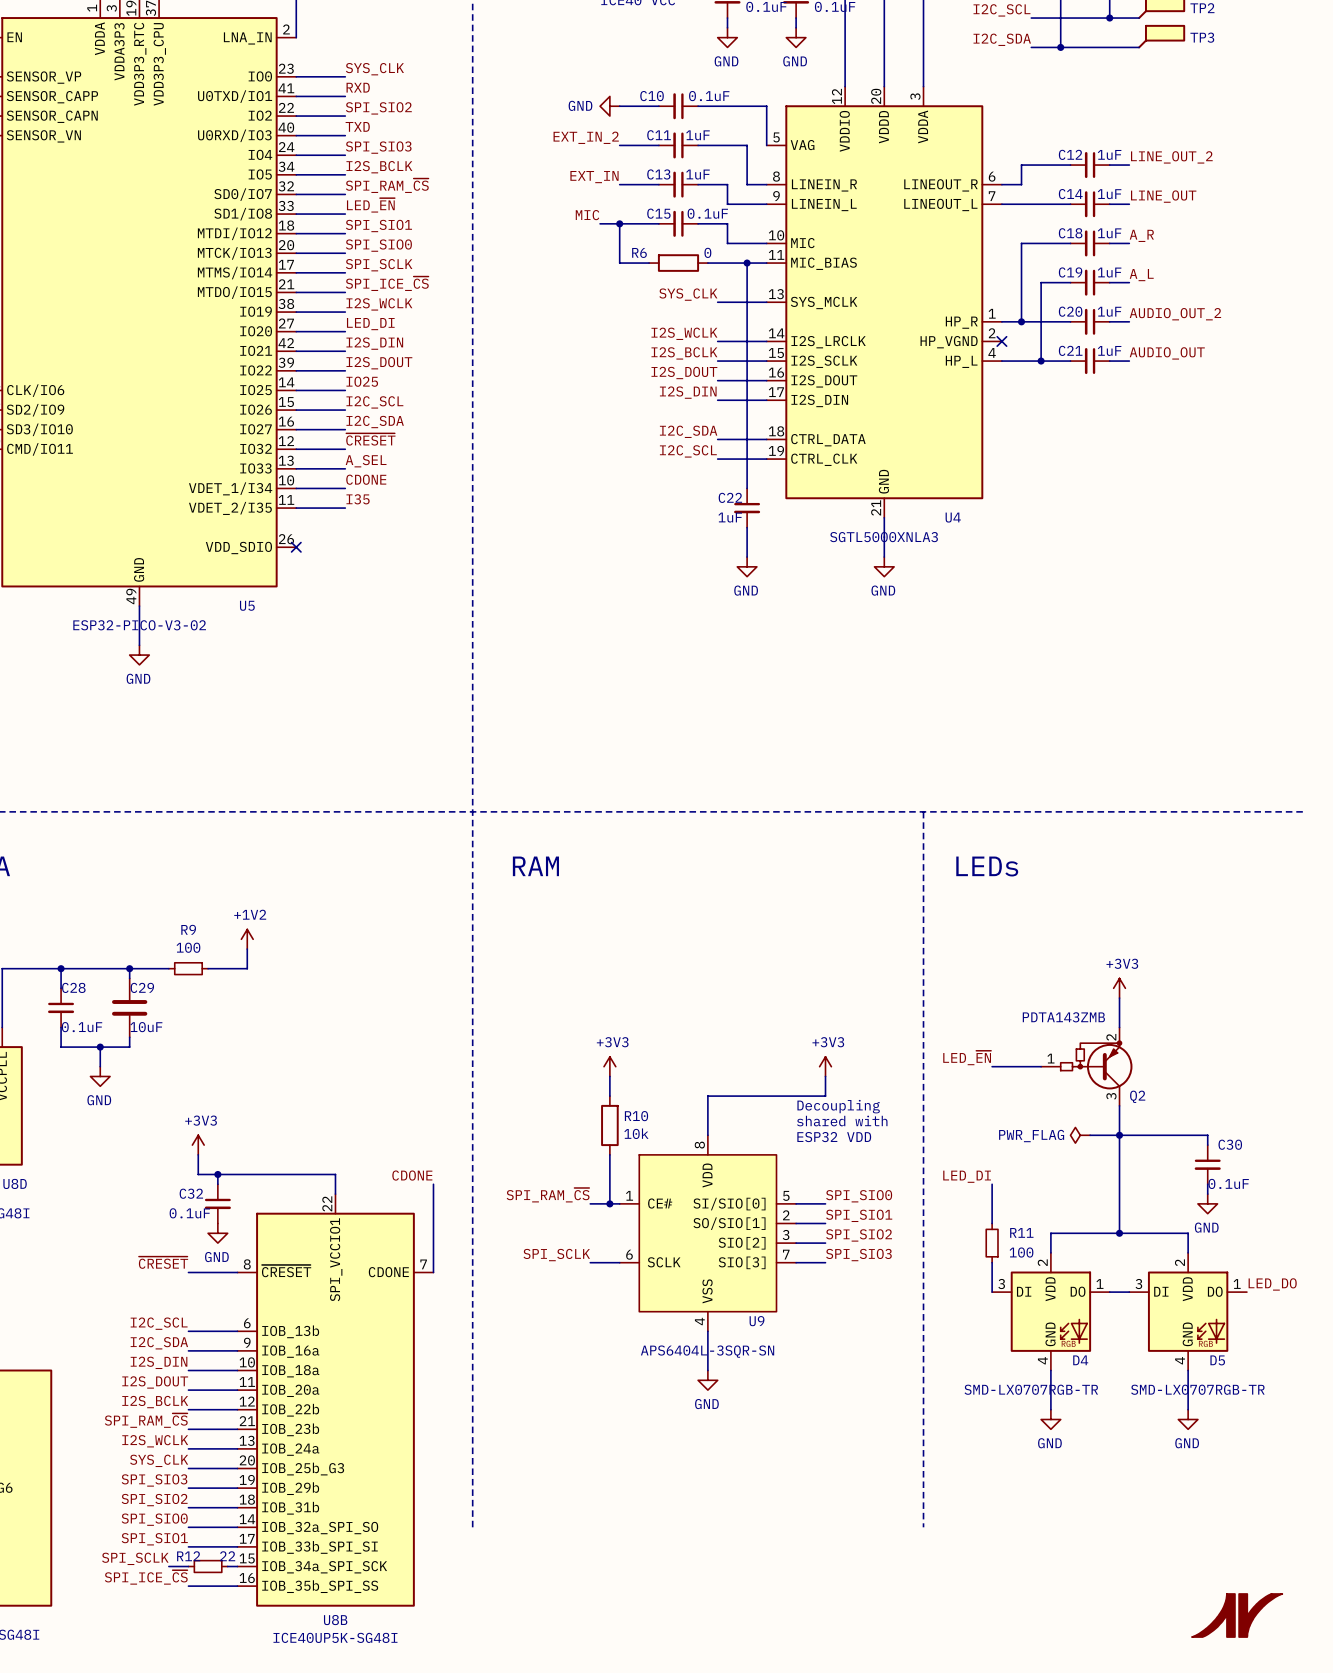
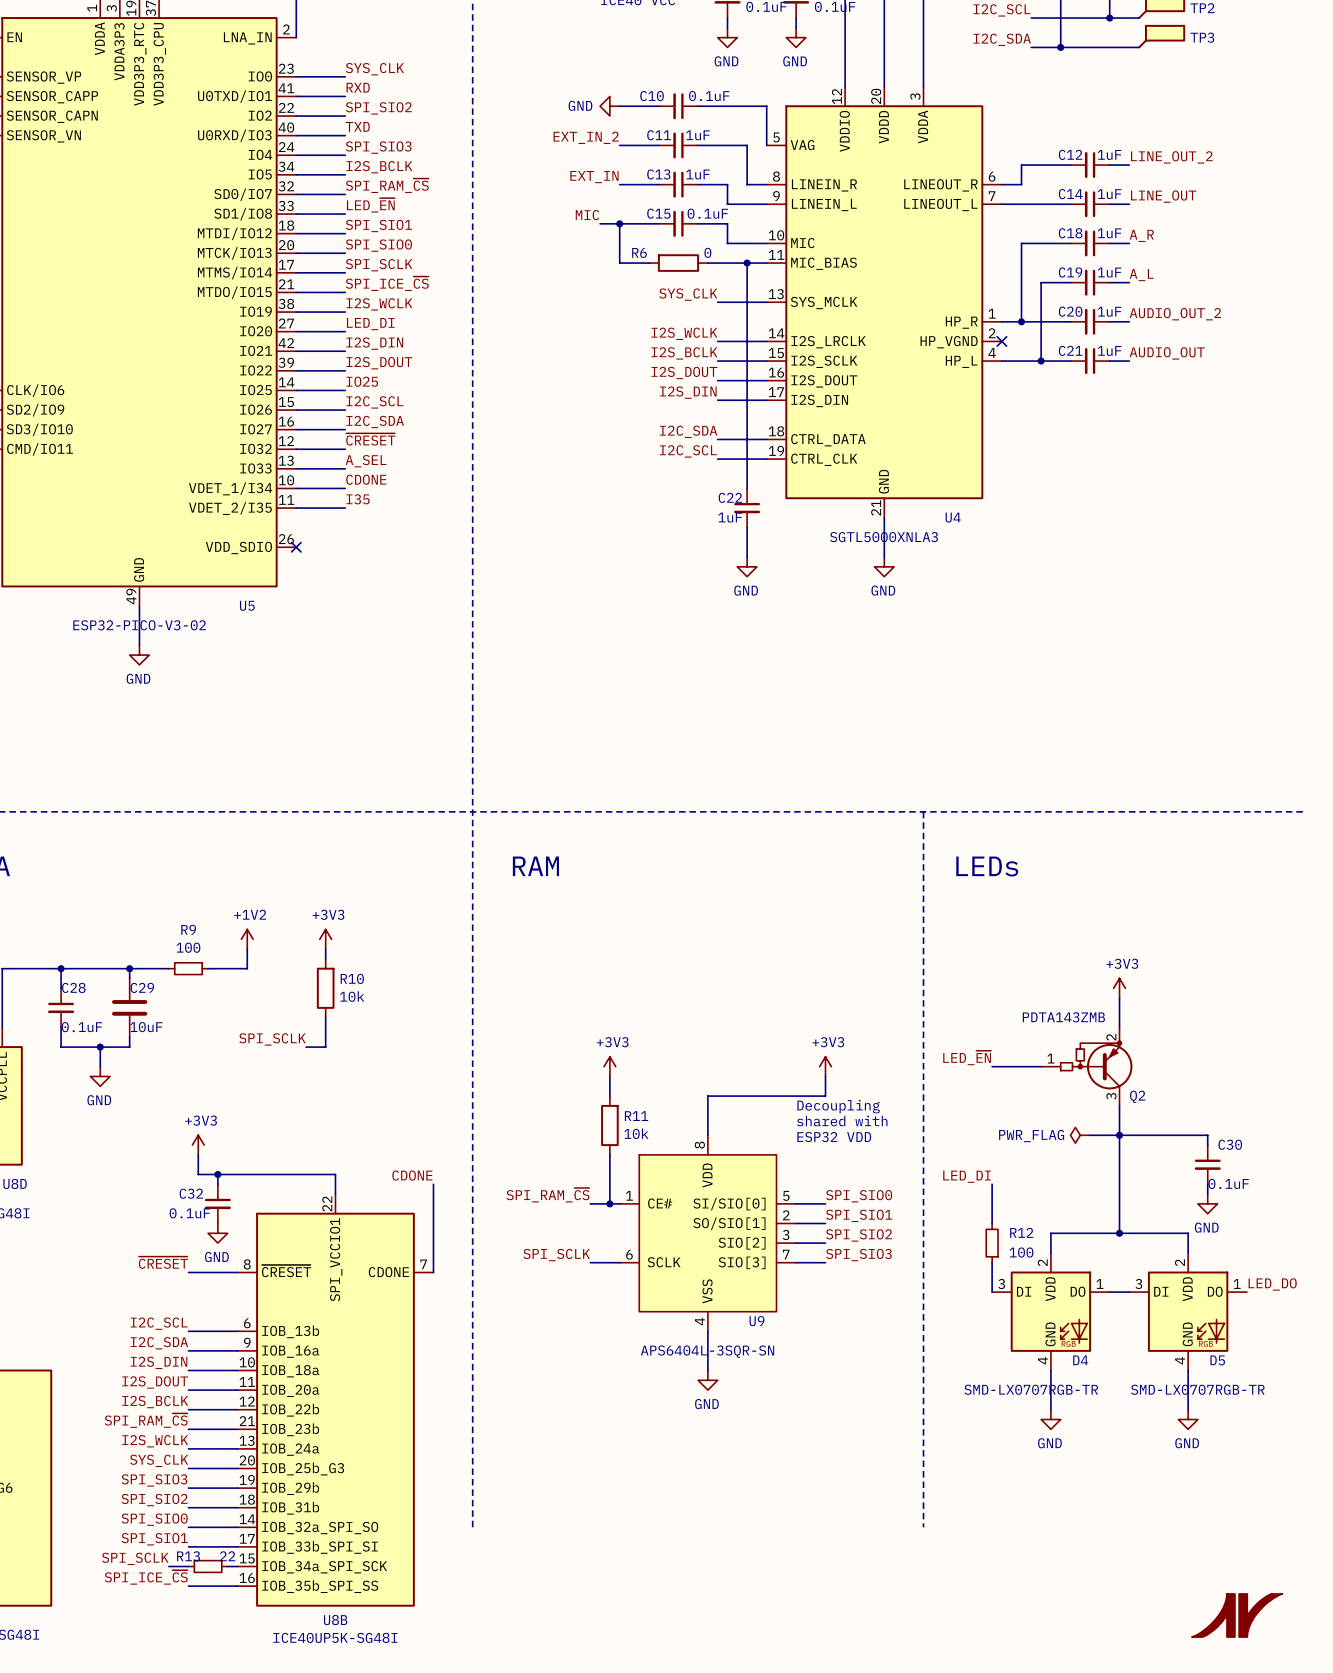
power symbol: none -> +3V3 (325, 939)
wire: none -> (325, 949) (325, 958)
R10: none -> 10k (325, 988)
wire: none -> (325, 1017) (325, 1047) (306, 1047)
label: none -> SPI_SCLK (272, 1039)
R10 name: R10 (636, 1116) -> R11 (636, 1116)
R11 name: R11 (1021, 1232) -> R12 (1021, 1232)
R12 name: R12 (188, 1556) -> R13 (188, 1556)

